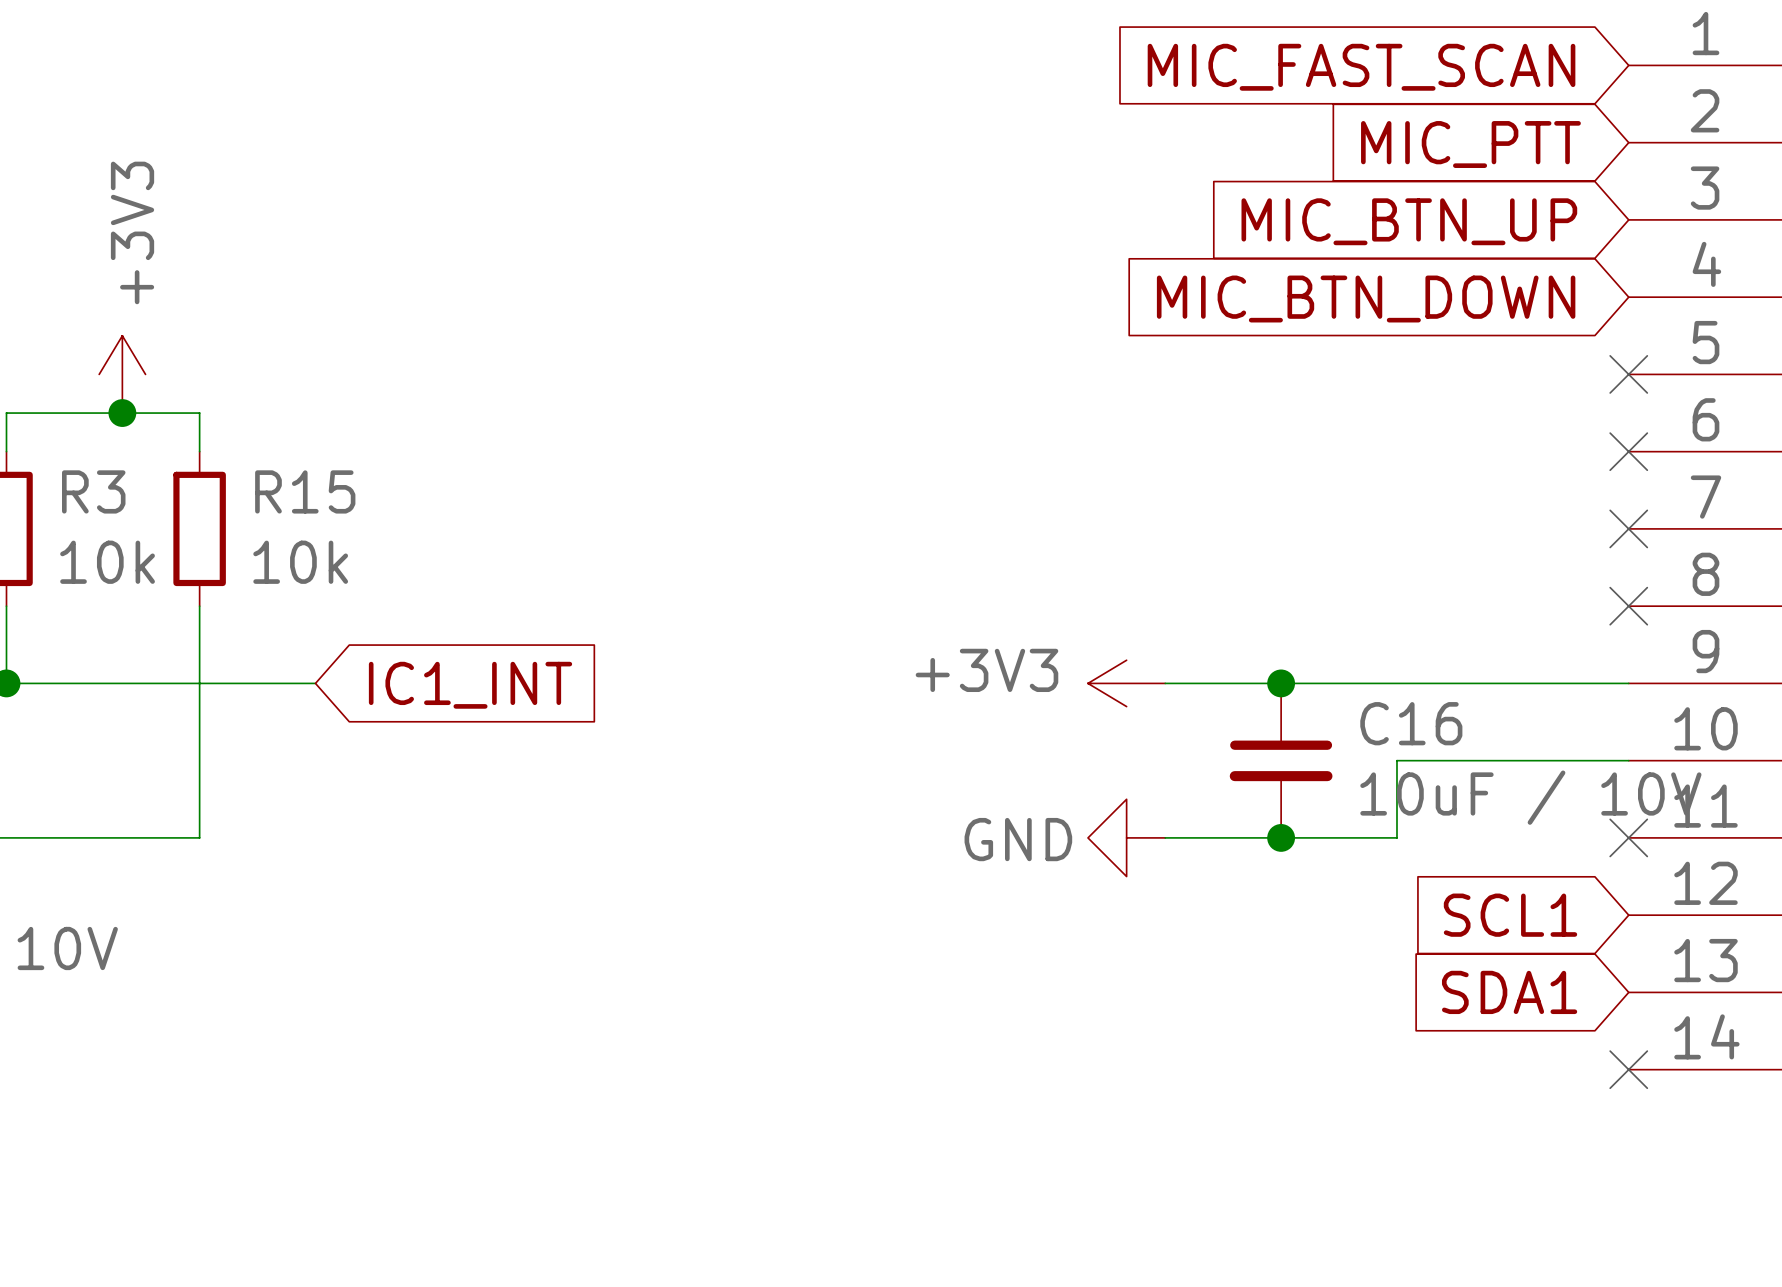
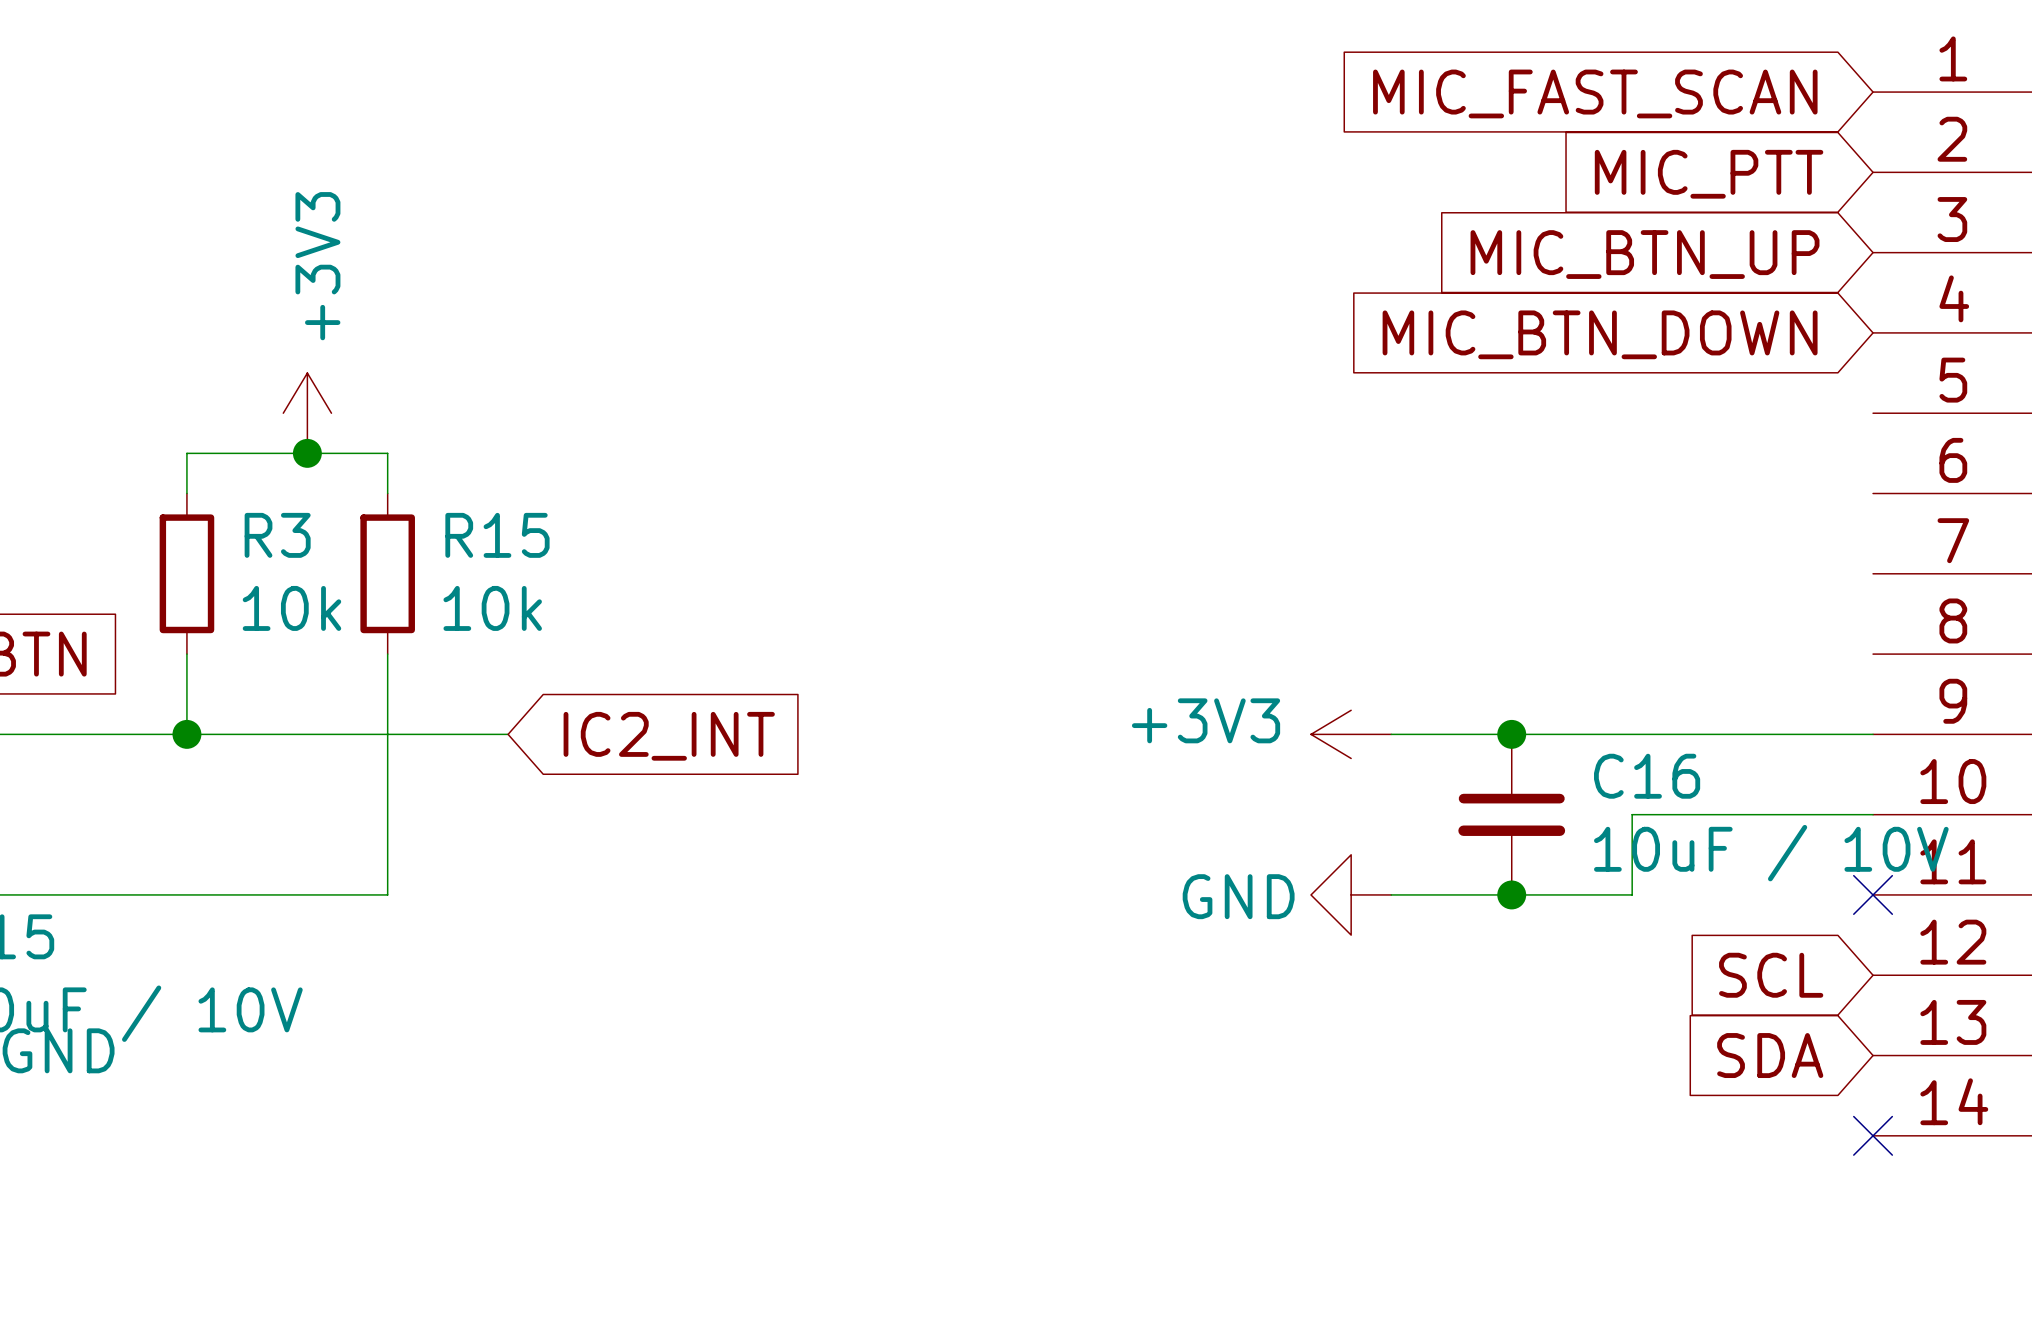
no-connect mark: (1628, 374) -> none
no-connect mark: (1628, 451) -> none
no-connect mark: (1628, 528) -> none
no-connect mark: (1628, 606) -> none
global label: IC1_INT (470, 685) -> IC2_INT (669, 736)
global label: SCL1 (1510, 915) -> SCL (1771, 975)
global label: SDA1 (1509, 992) -> SDA (1770, 1055)

